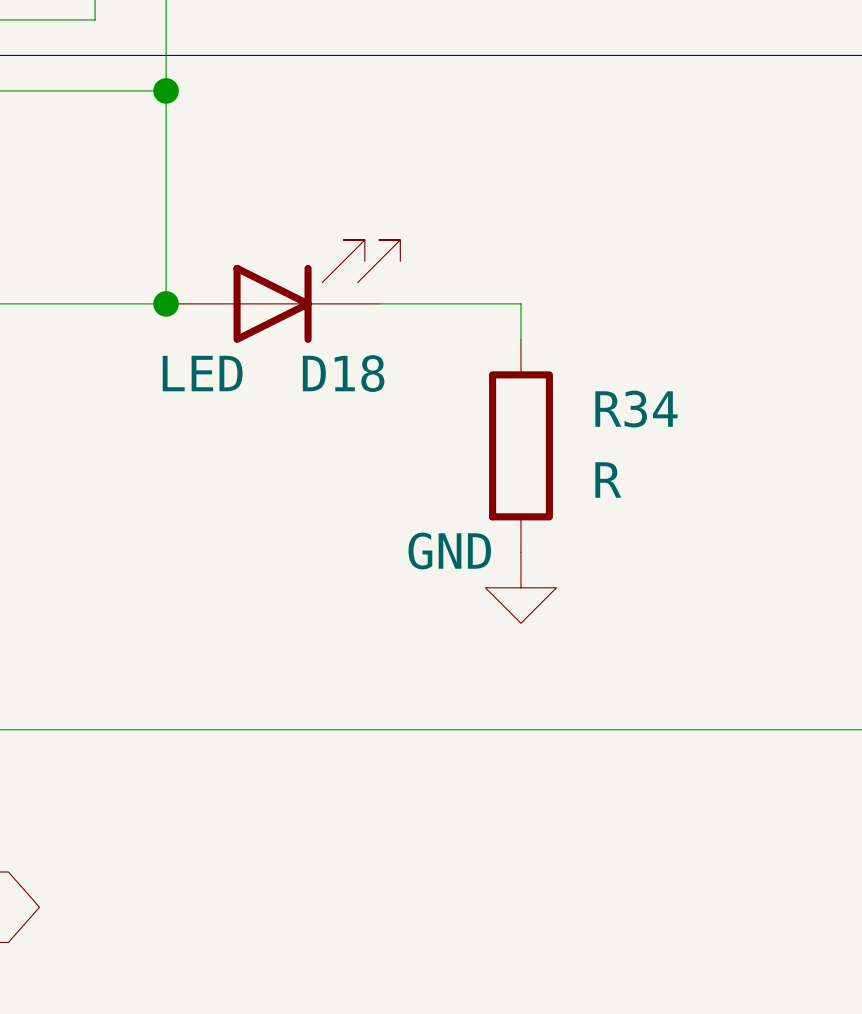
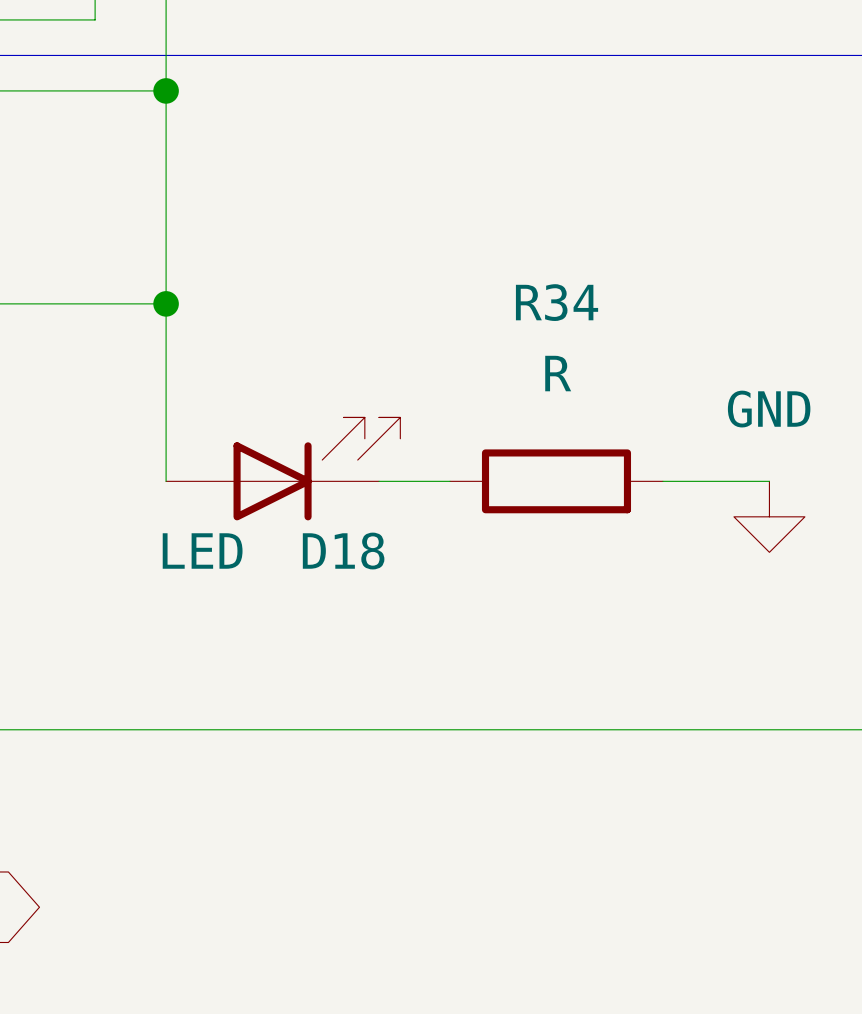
D18 position: (283, 291) -> (283, 468)
wire: none -> (166, 303) (166, 481)
wire: (379, 303) (520, 303) (520, 339) -> none
R34 name position: R34 (636, 409) -> R34 (557, 302)
R34 rotation: 0° (520, 445) -> 90° clockwise (556, 481)
R34 value position: R (608, 480) -> R (558, 373)
wire: none -> (379, 481) (450, 481)
wire: none -> (662, 481) (769, 481)
power symbol text position: GND (449, 551) -> GND (769, 409)
power symbol position: GND (520, 587) -> GND (769, 516)

